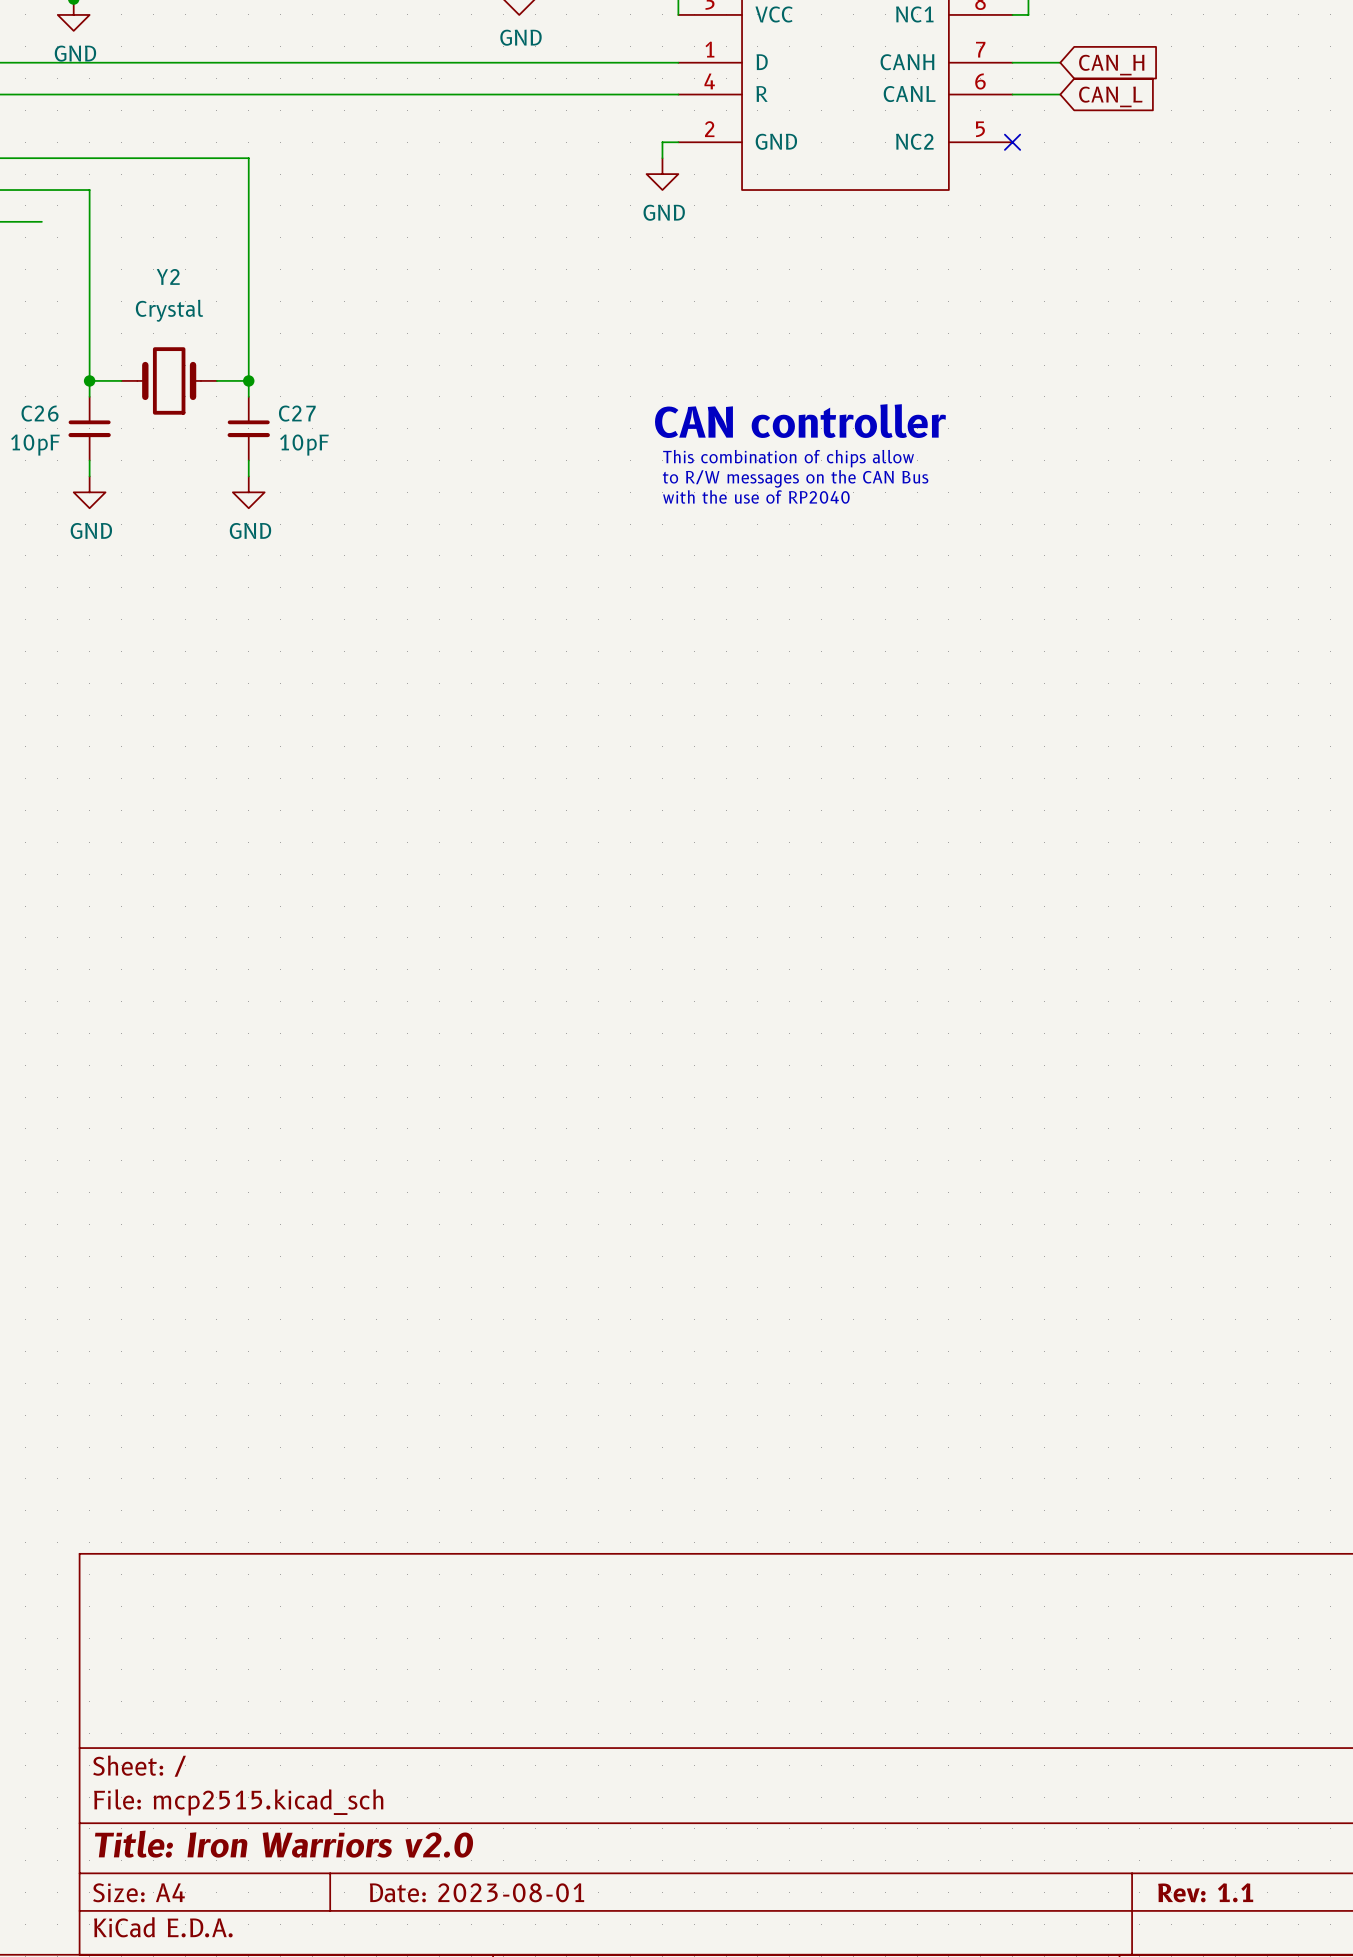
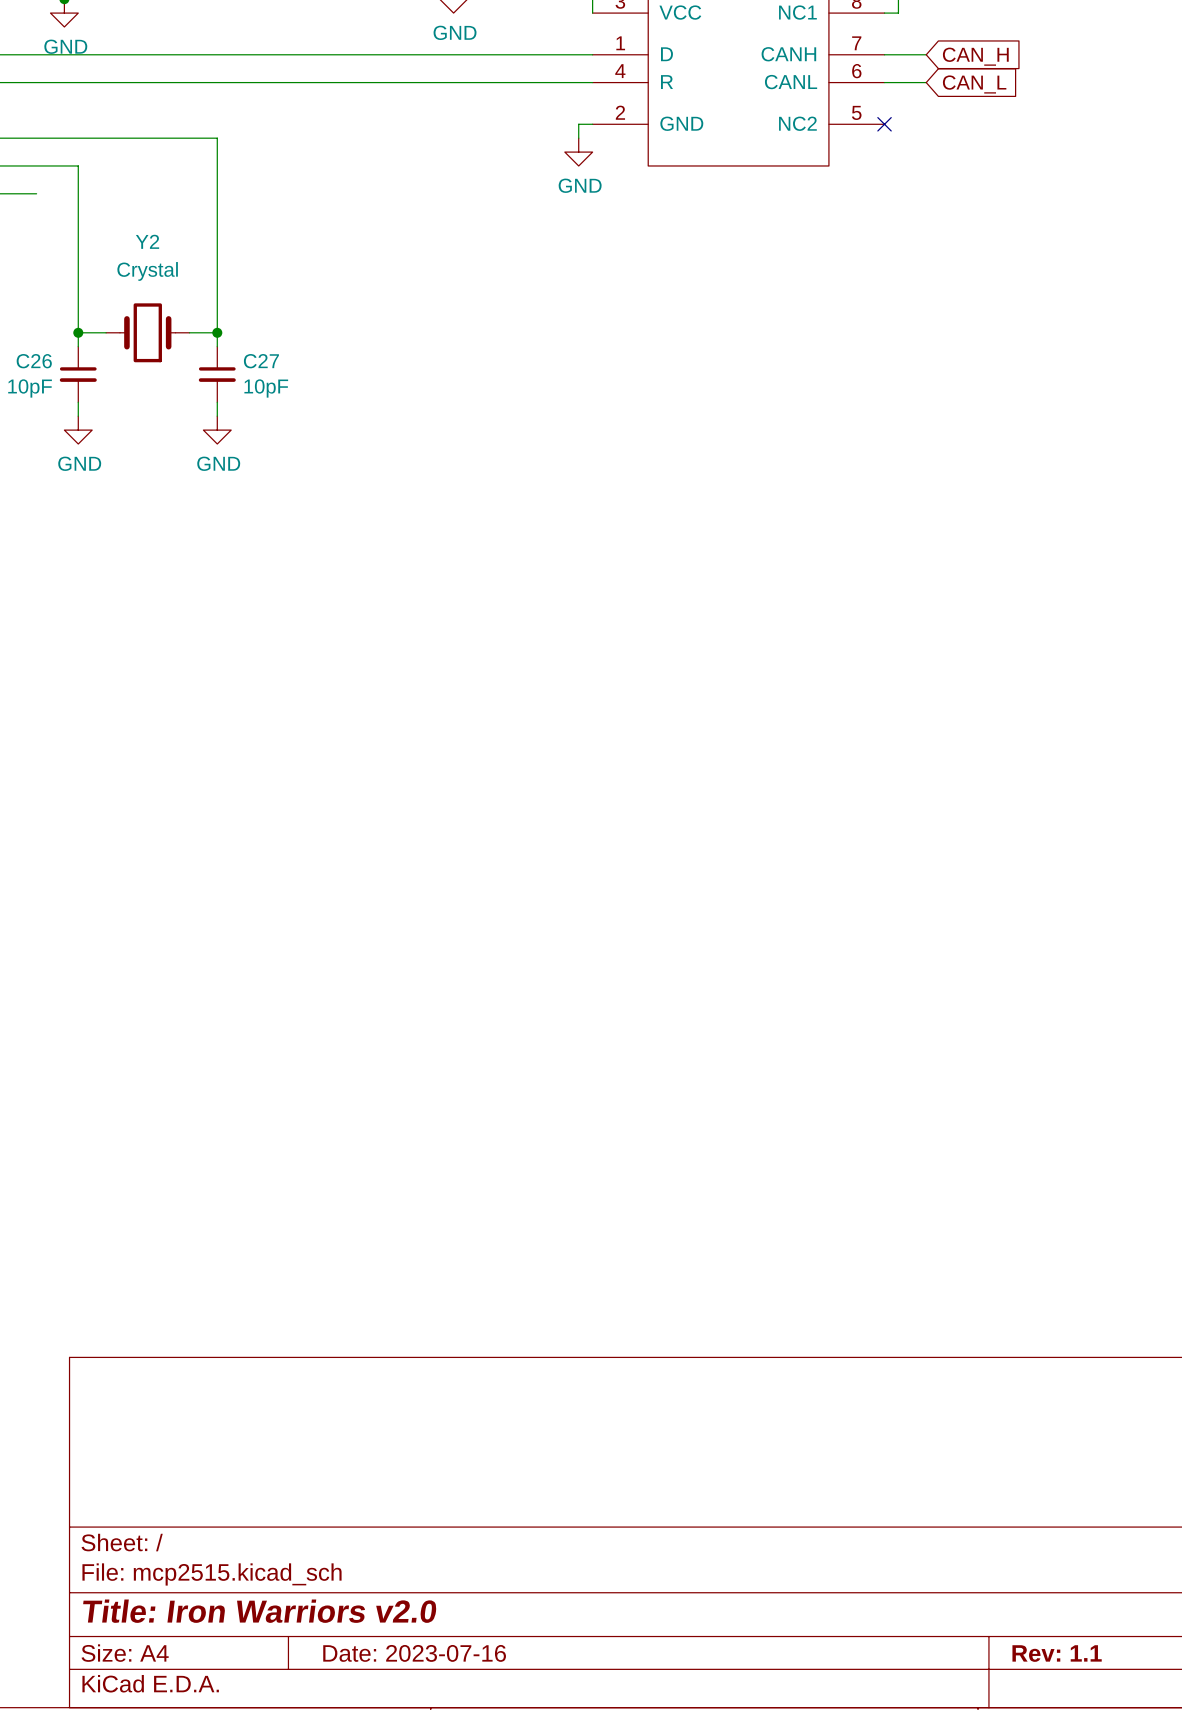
text: CAN controller (800, 421) -> none
text: This combination of chips allow (788, 458) -> none
text: to R/W messages on the CAN Bus (795, 478) -> none
text: with the use of RP2040 (756, 496) -> none
title block: Date: 2023-08-01 (477, 1892) -> Date: 2023-07-16 (414, 1653)

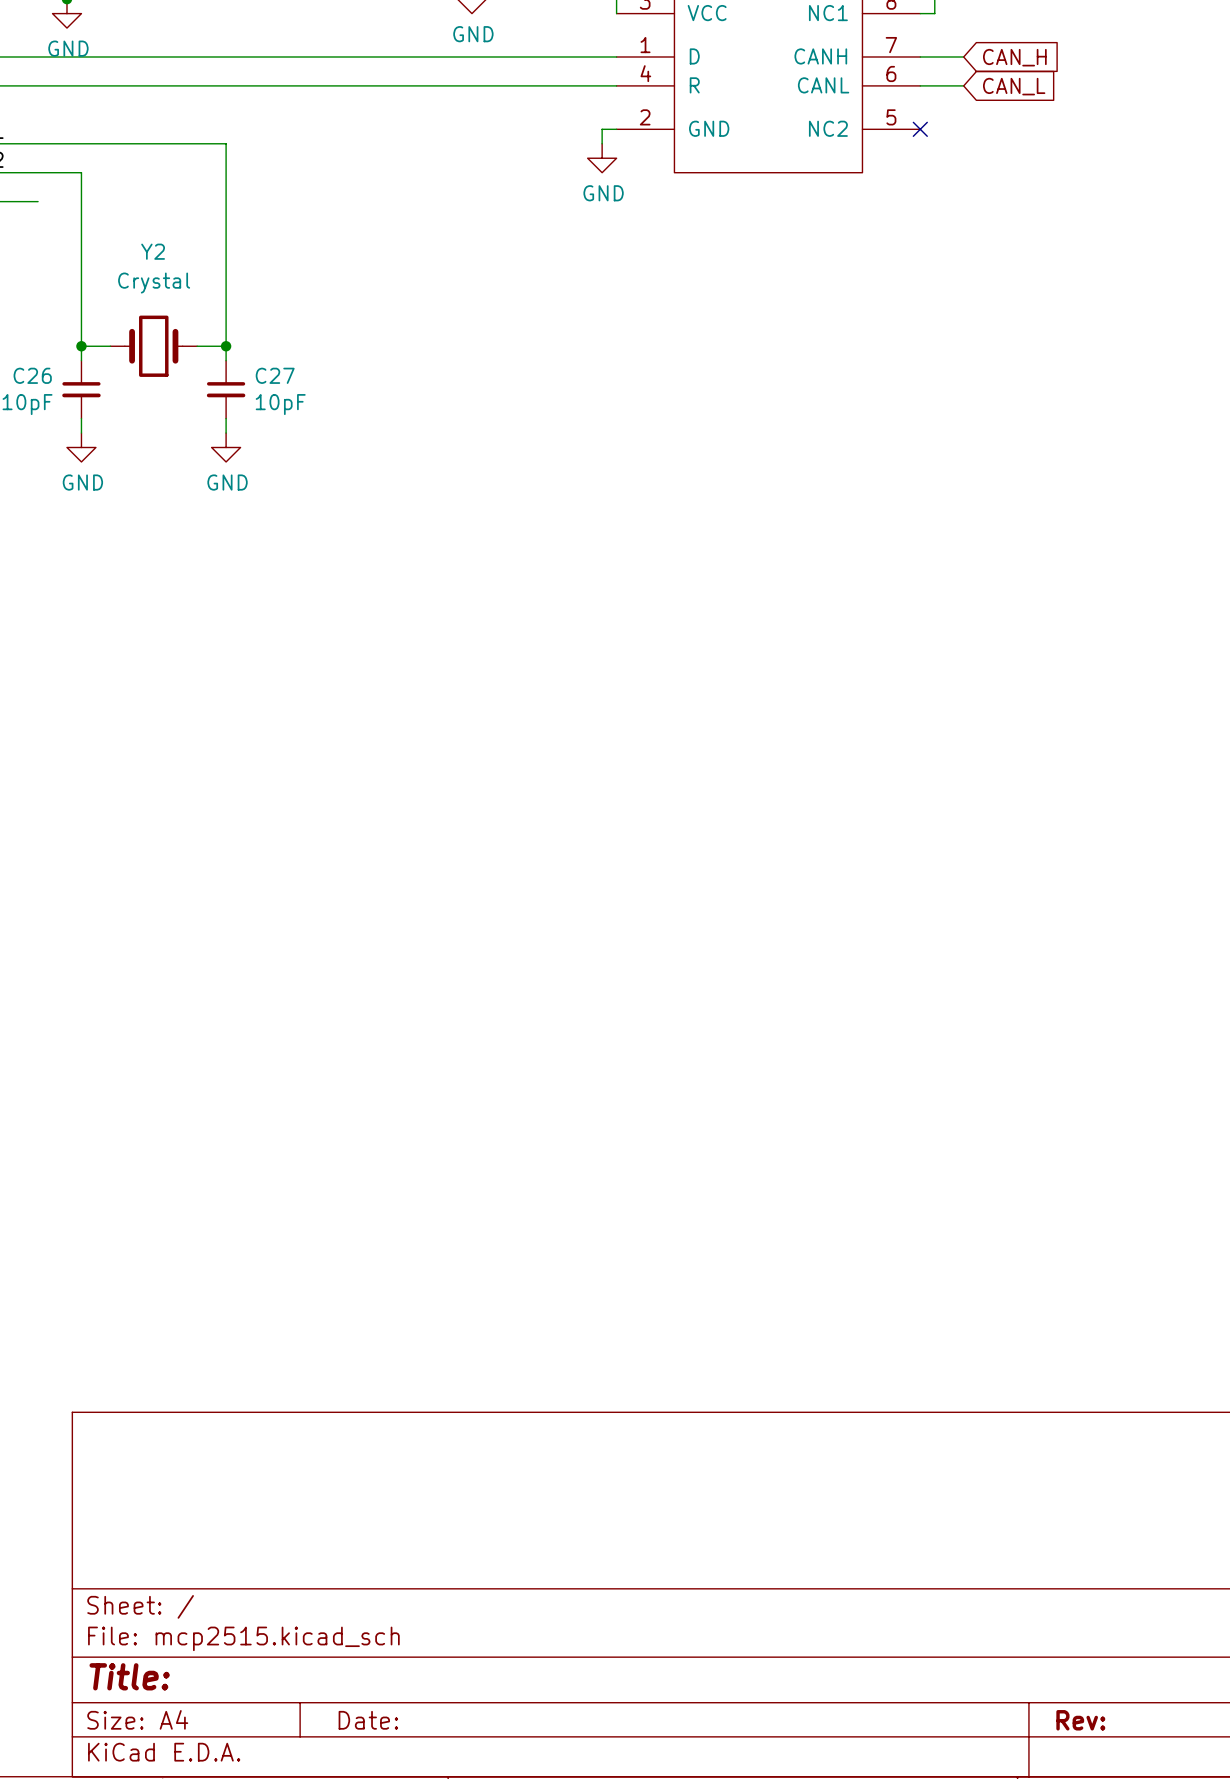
title block: Title: Iron Warriors v2.0 (259, 1611) -> Title: (129, 1676)
title block: Date: 2023-07-16 (414, 1653) -> Date: (368, 1720)
title block: Rev: 1.1 (1057, 1653) -> Rev: (1080, 1720)

